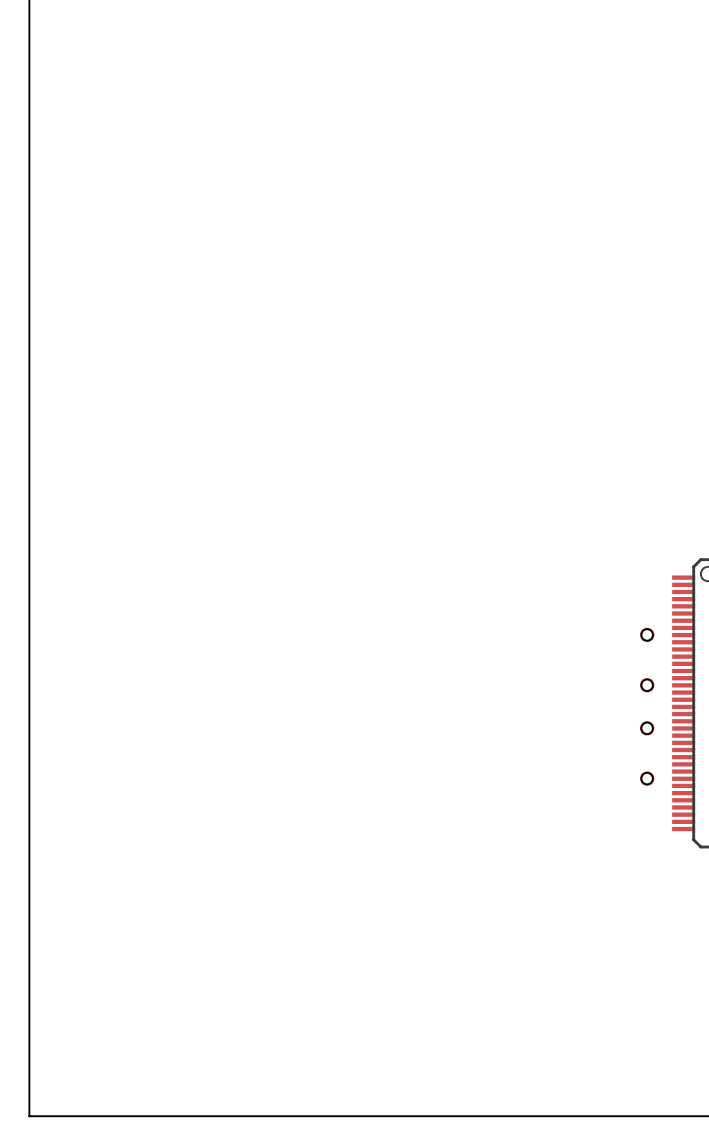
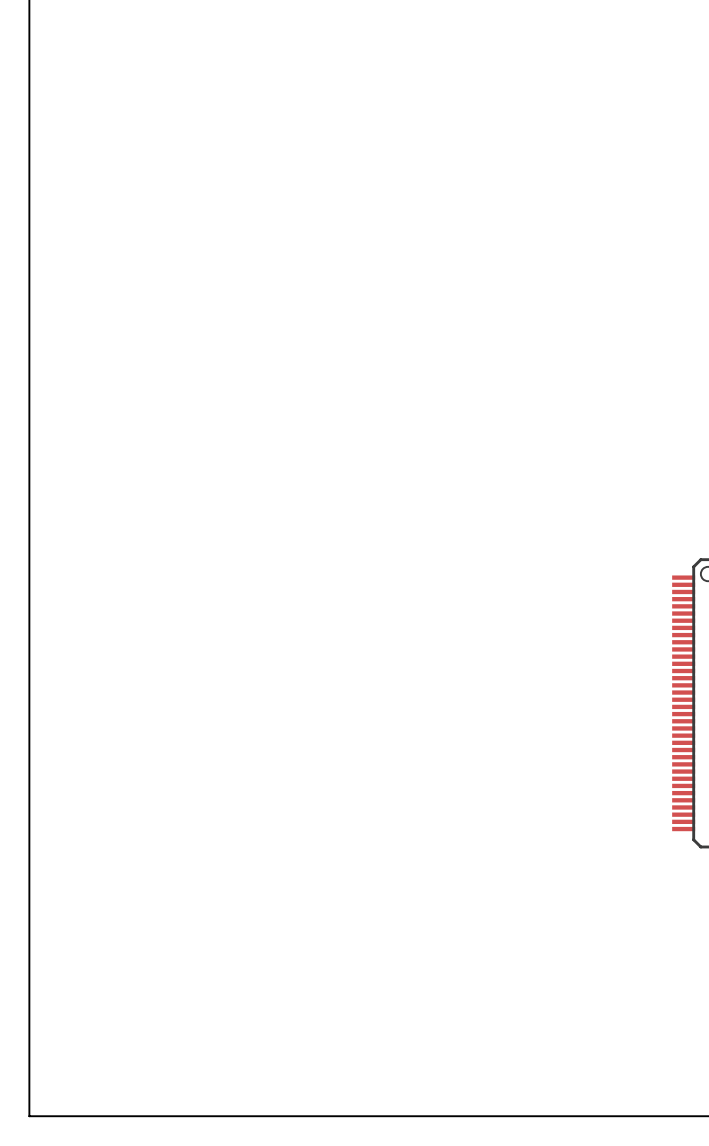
part: (647, 634) -> none
part: (647, 685) -> none
part: (647, 728) -> none
part: (647, 778) -> none

